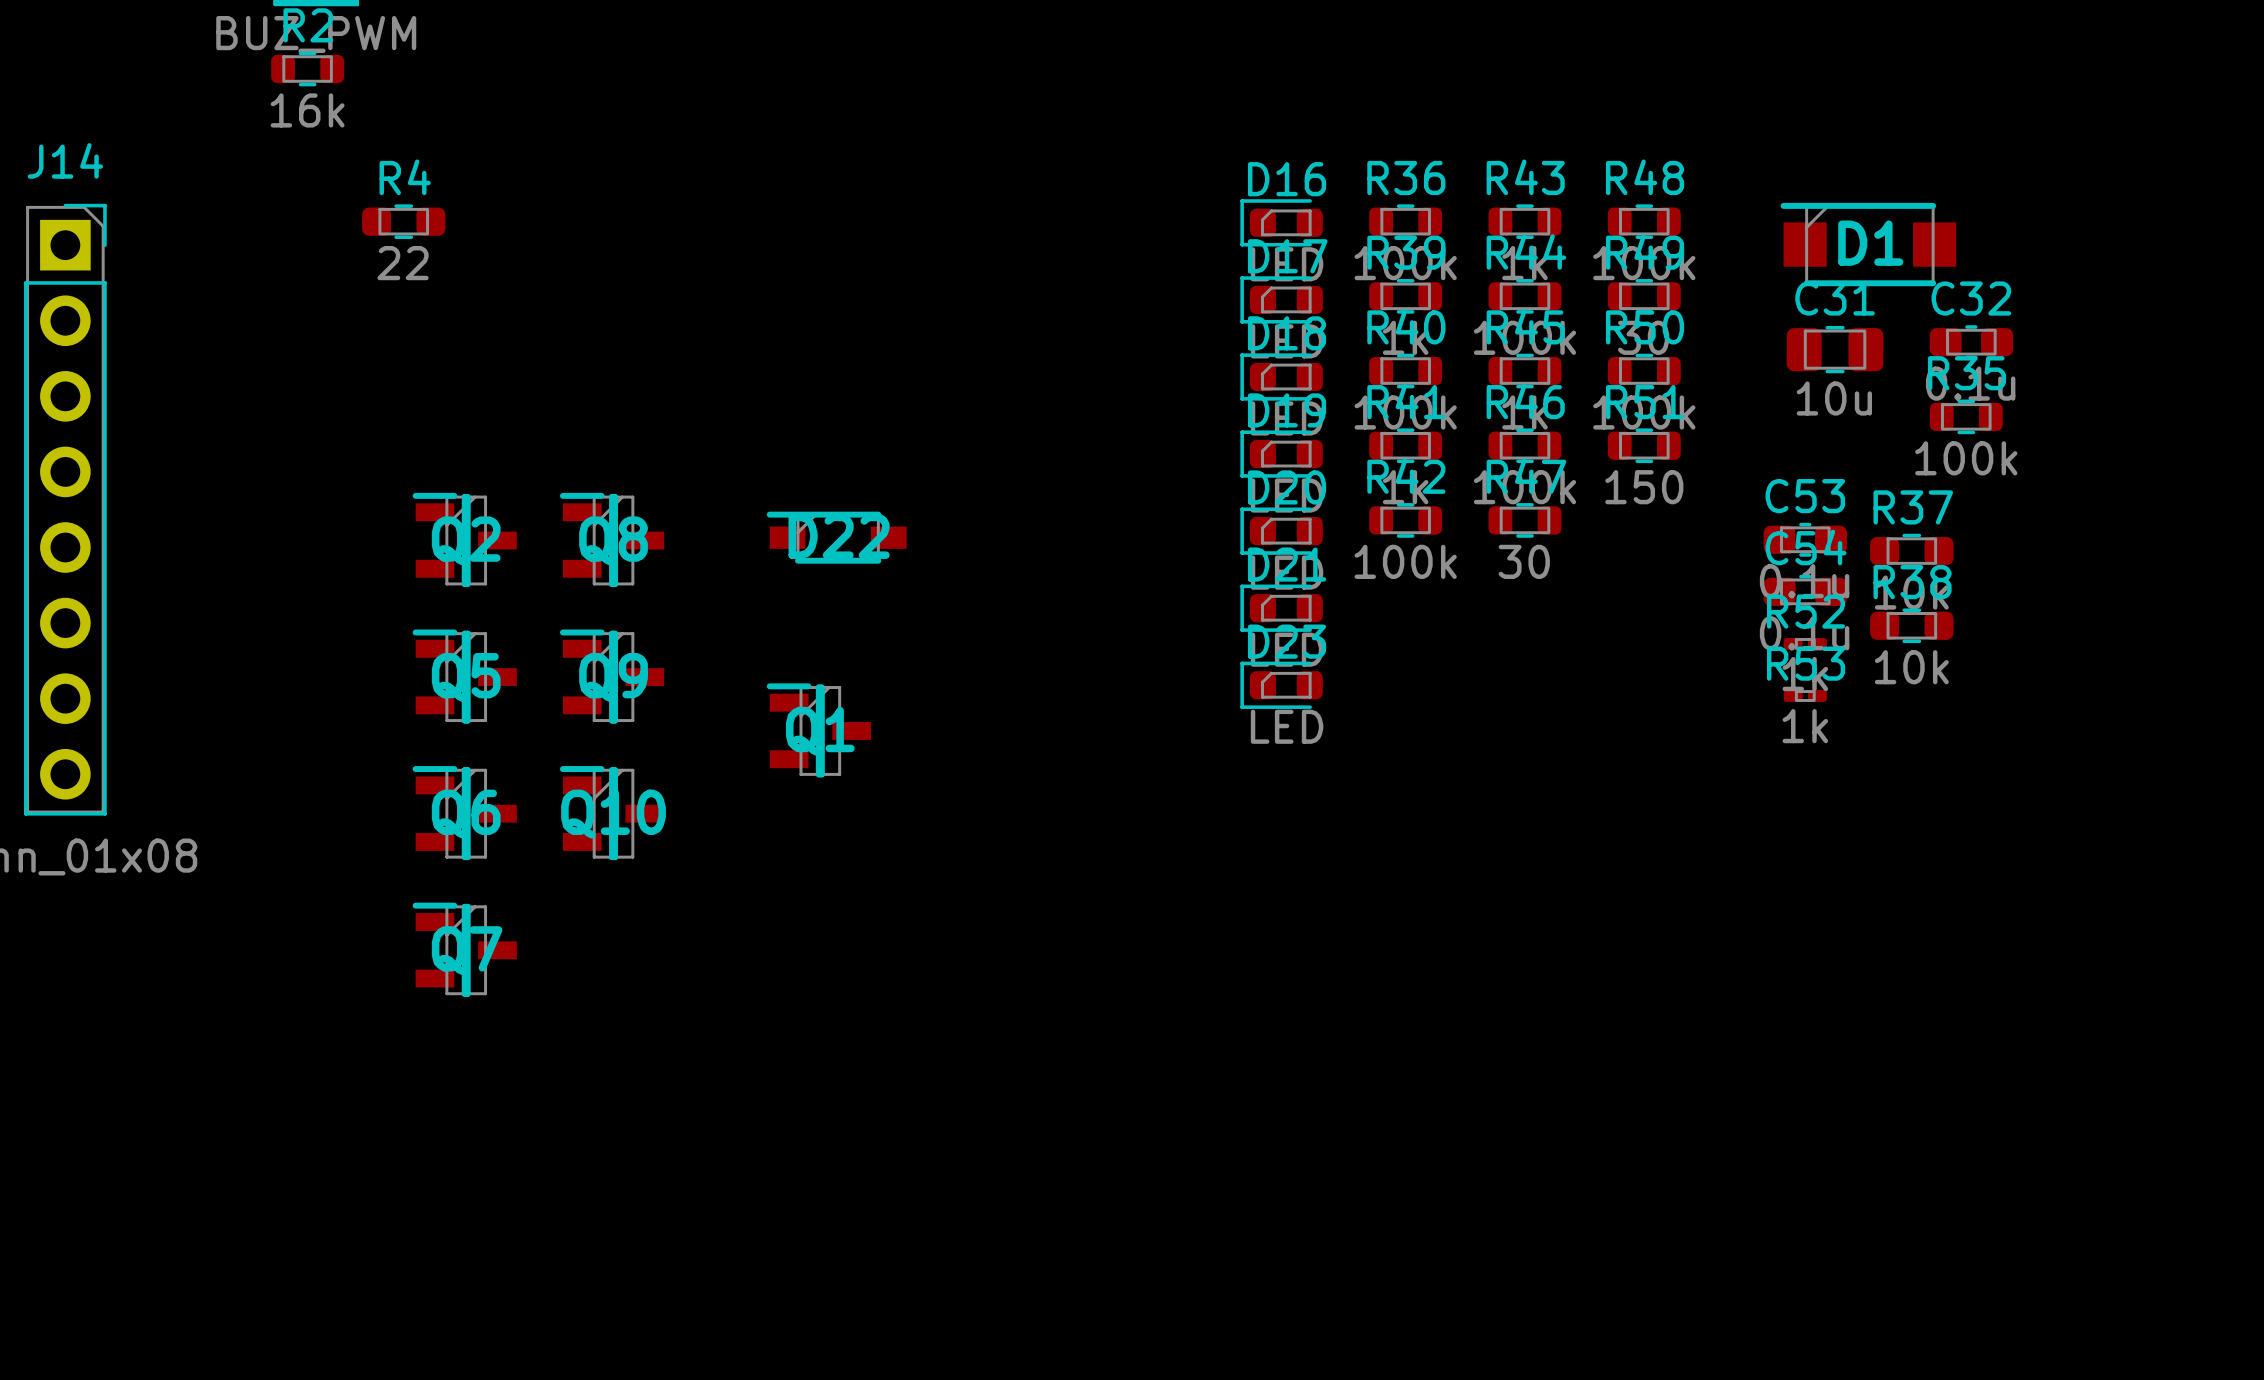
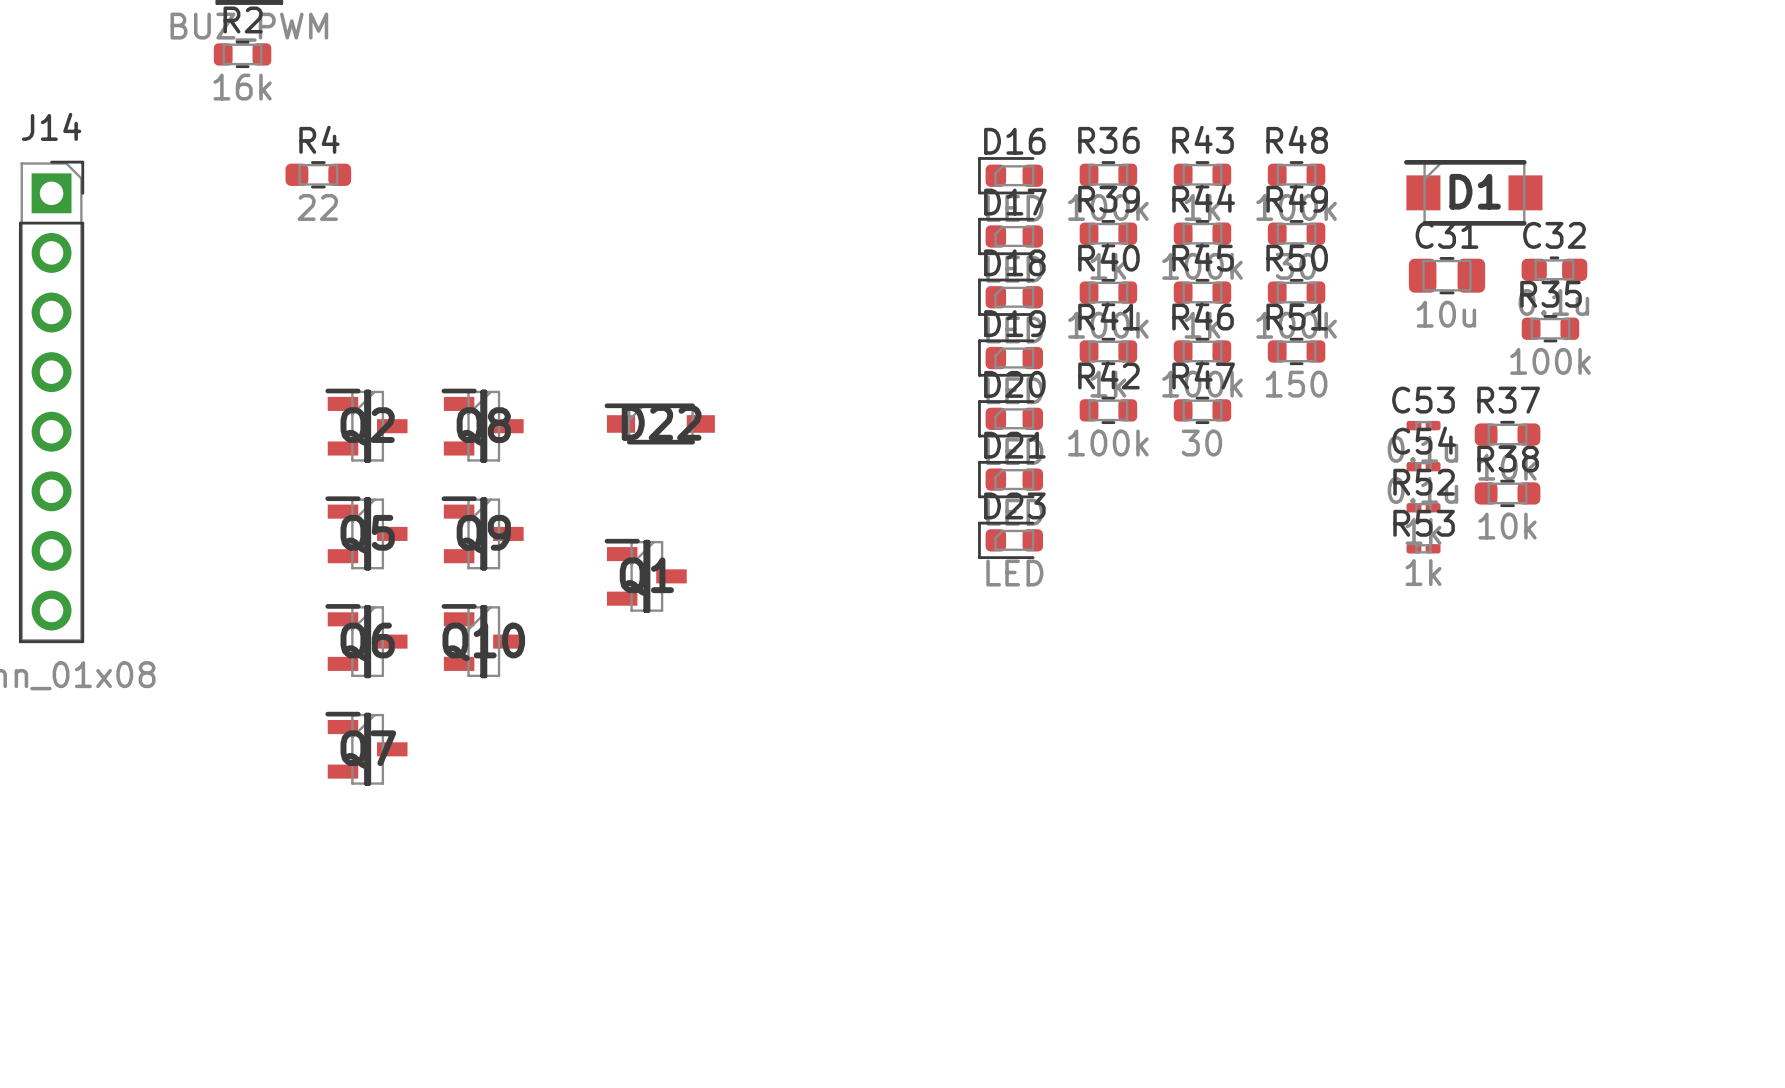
C53 footprint: [1763, 522, 1847, 557] -> [1406, 420, 1441, 431]
C54 footprint: [1763, 574, 1847, 609] -> [1406, 461, 1441, 472]

